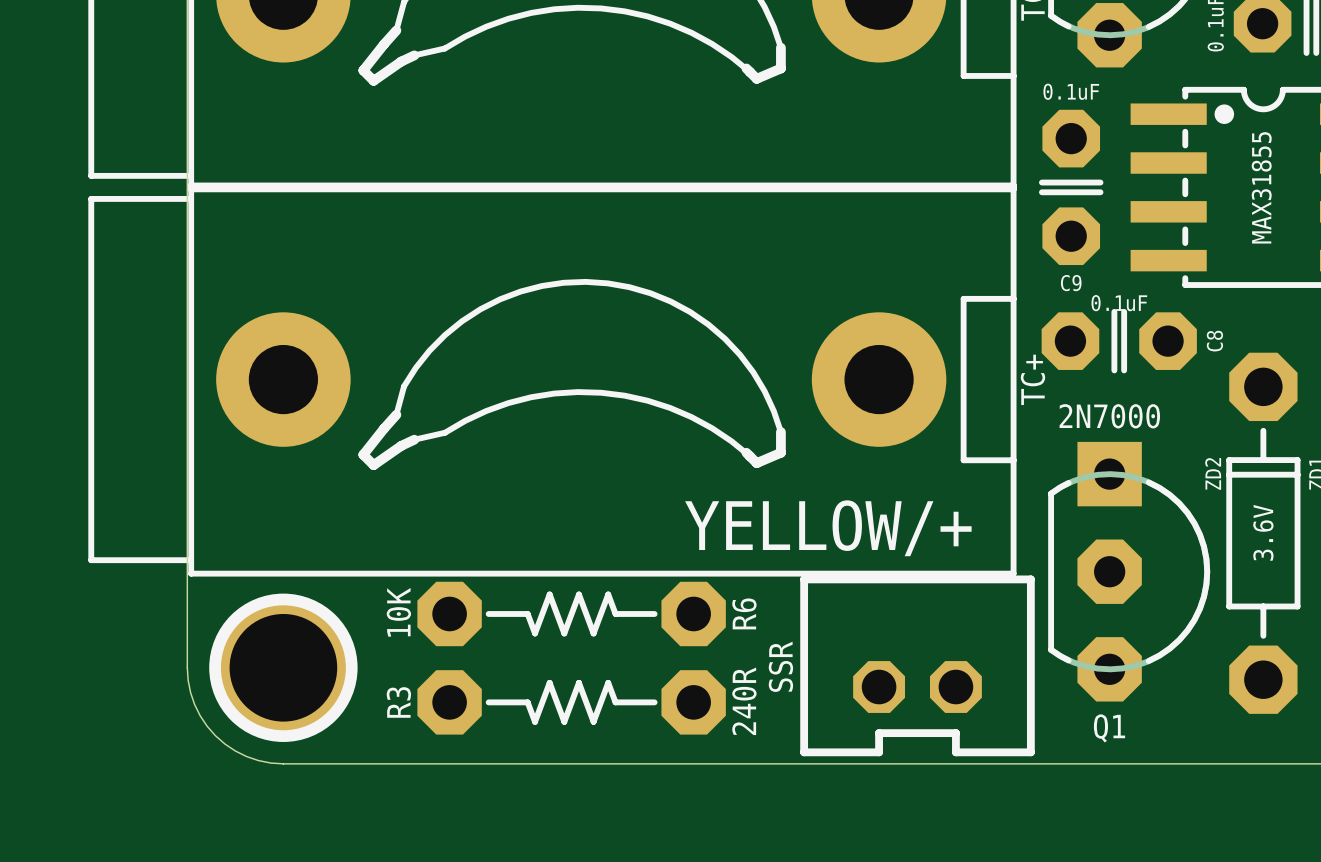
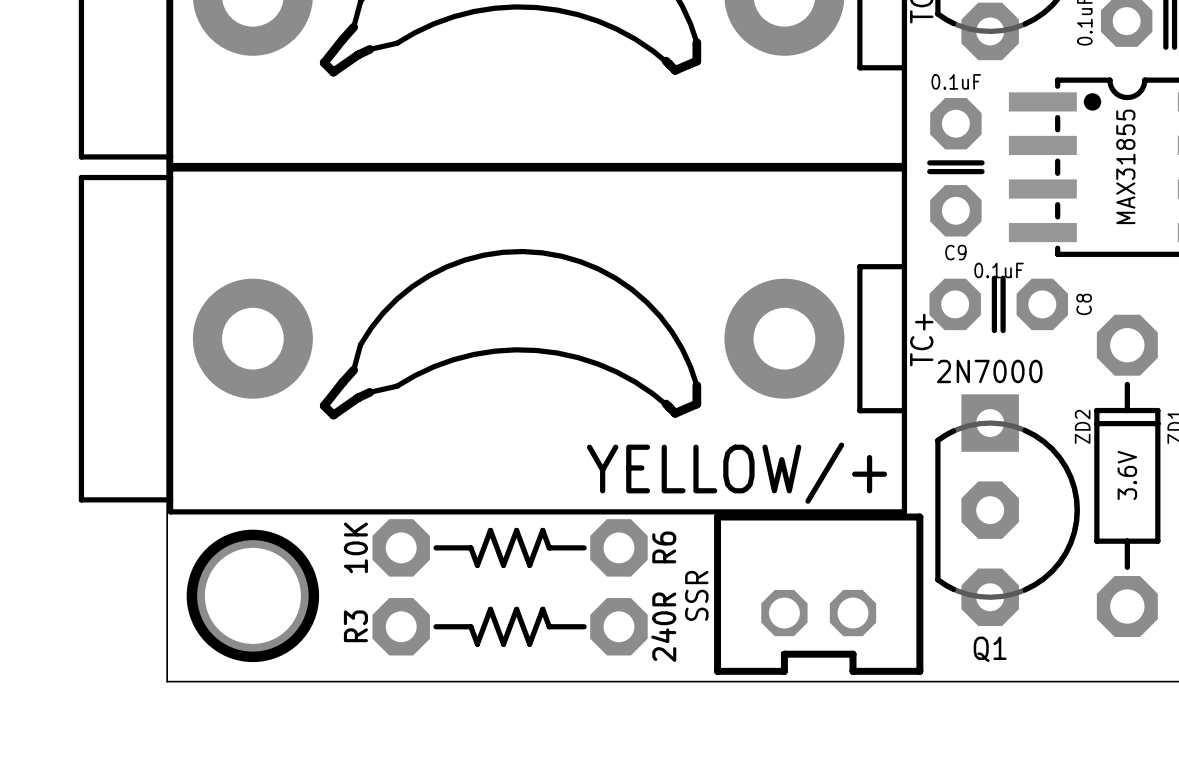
board edge: (187, 667) (188, 680) (194, 704) (200, 715) (215, 735) (235, 751) (246, 756) (270, 763) (283, 763) -> (167, 595) (167, 681) (252, 681)

